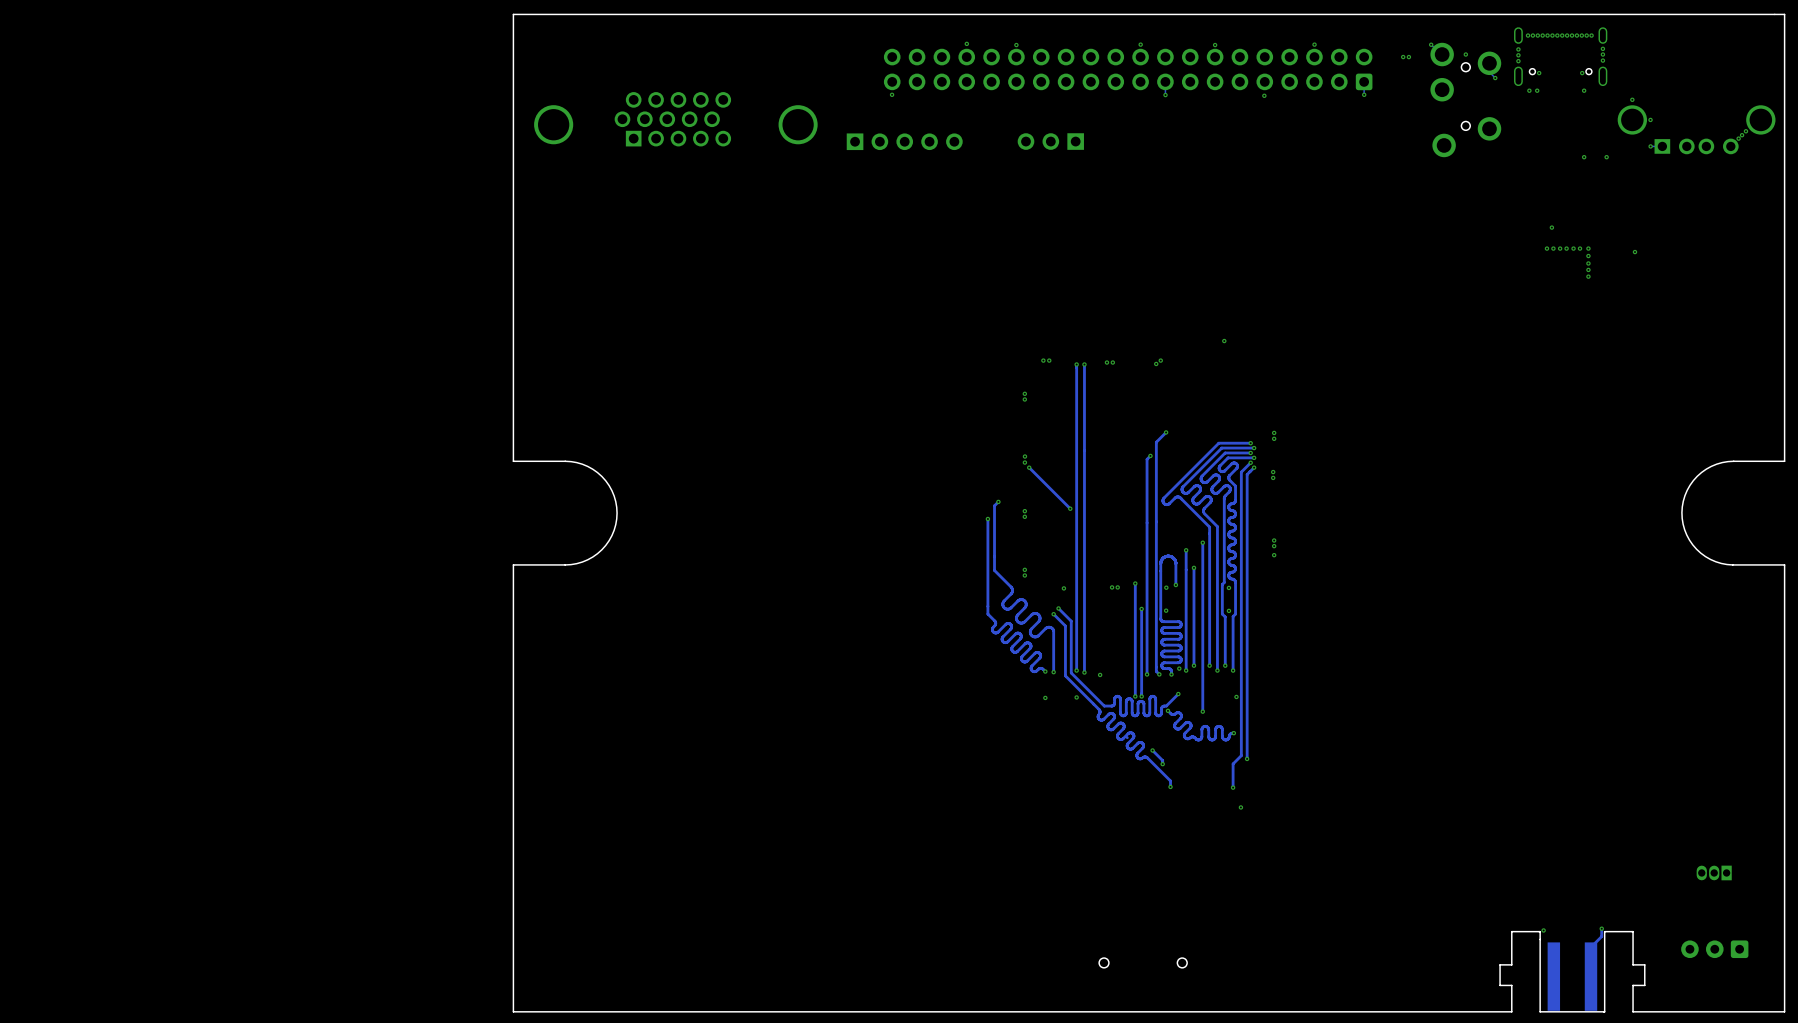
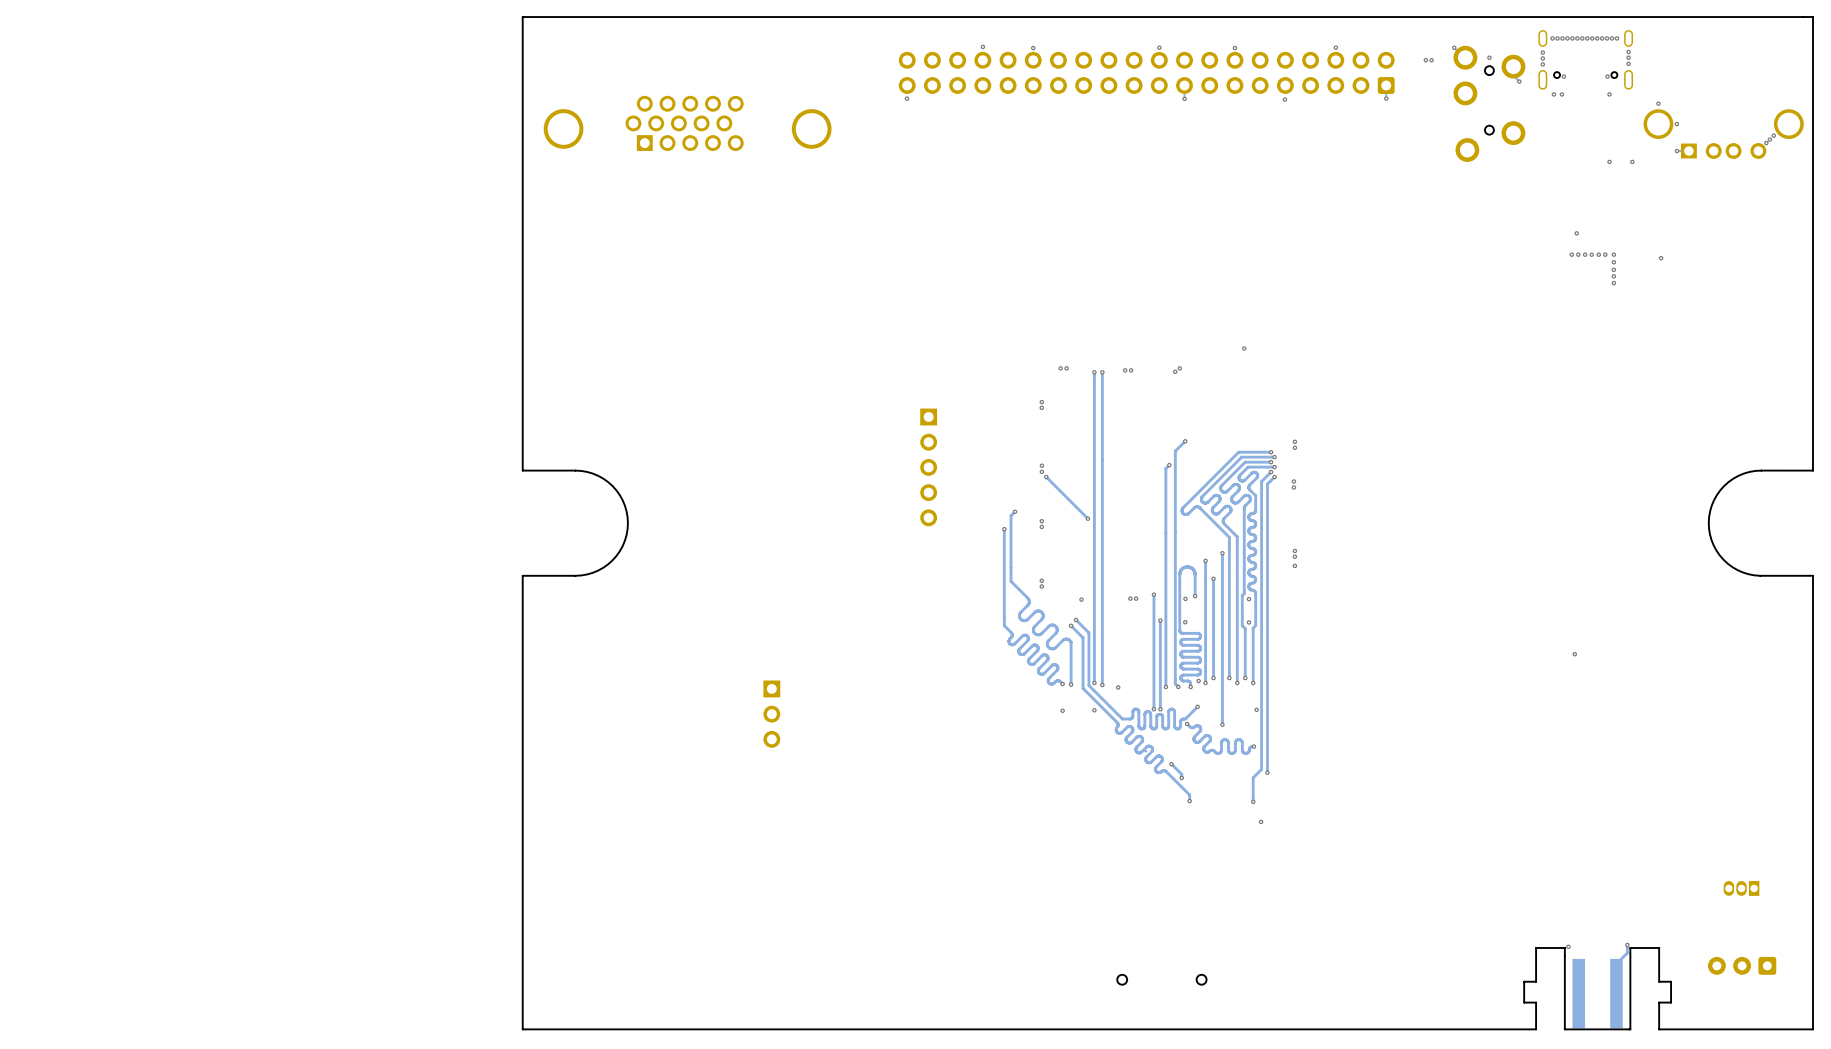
part: (904, 141) -> none
part: (1050, 141) -> none
part: none -> (928, 467)
via: none -> (1574, 654)
part: none -> (771, 714)

